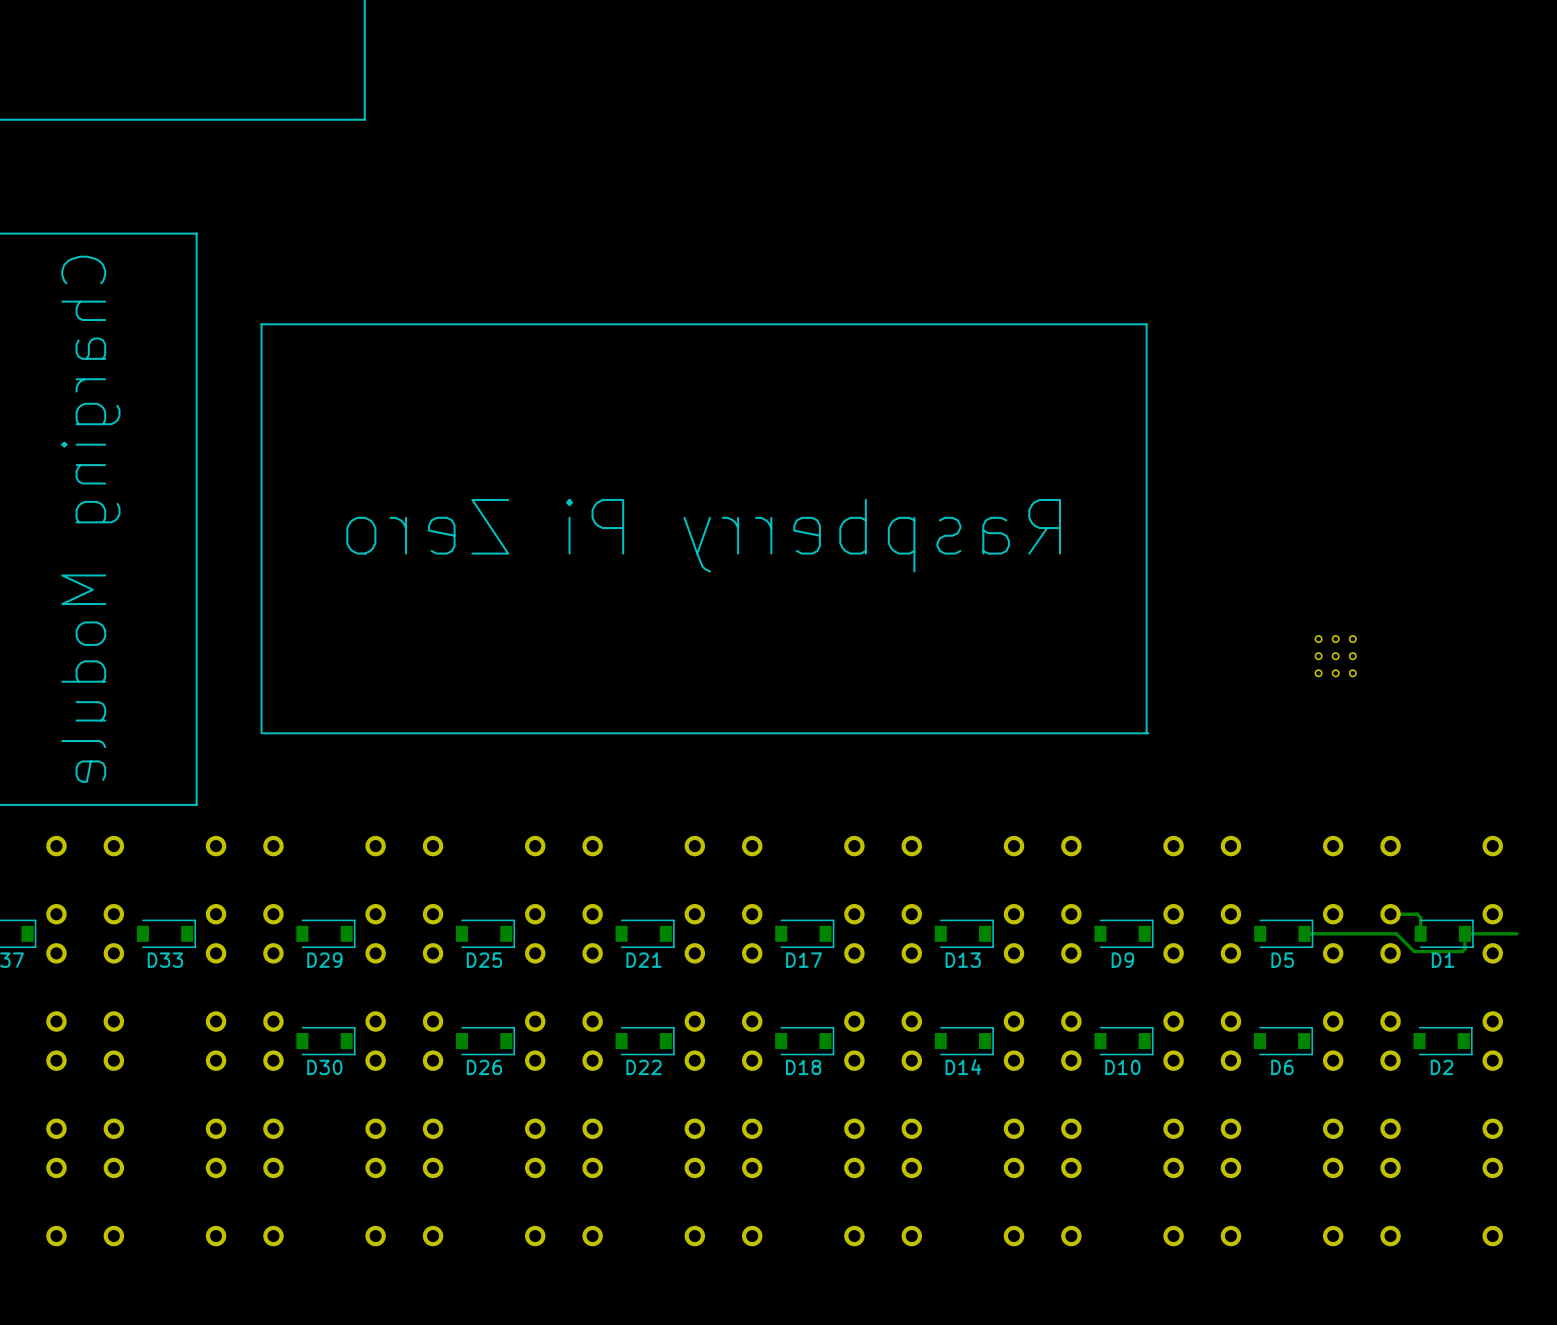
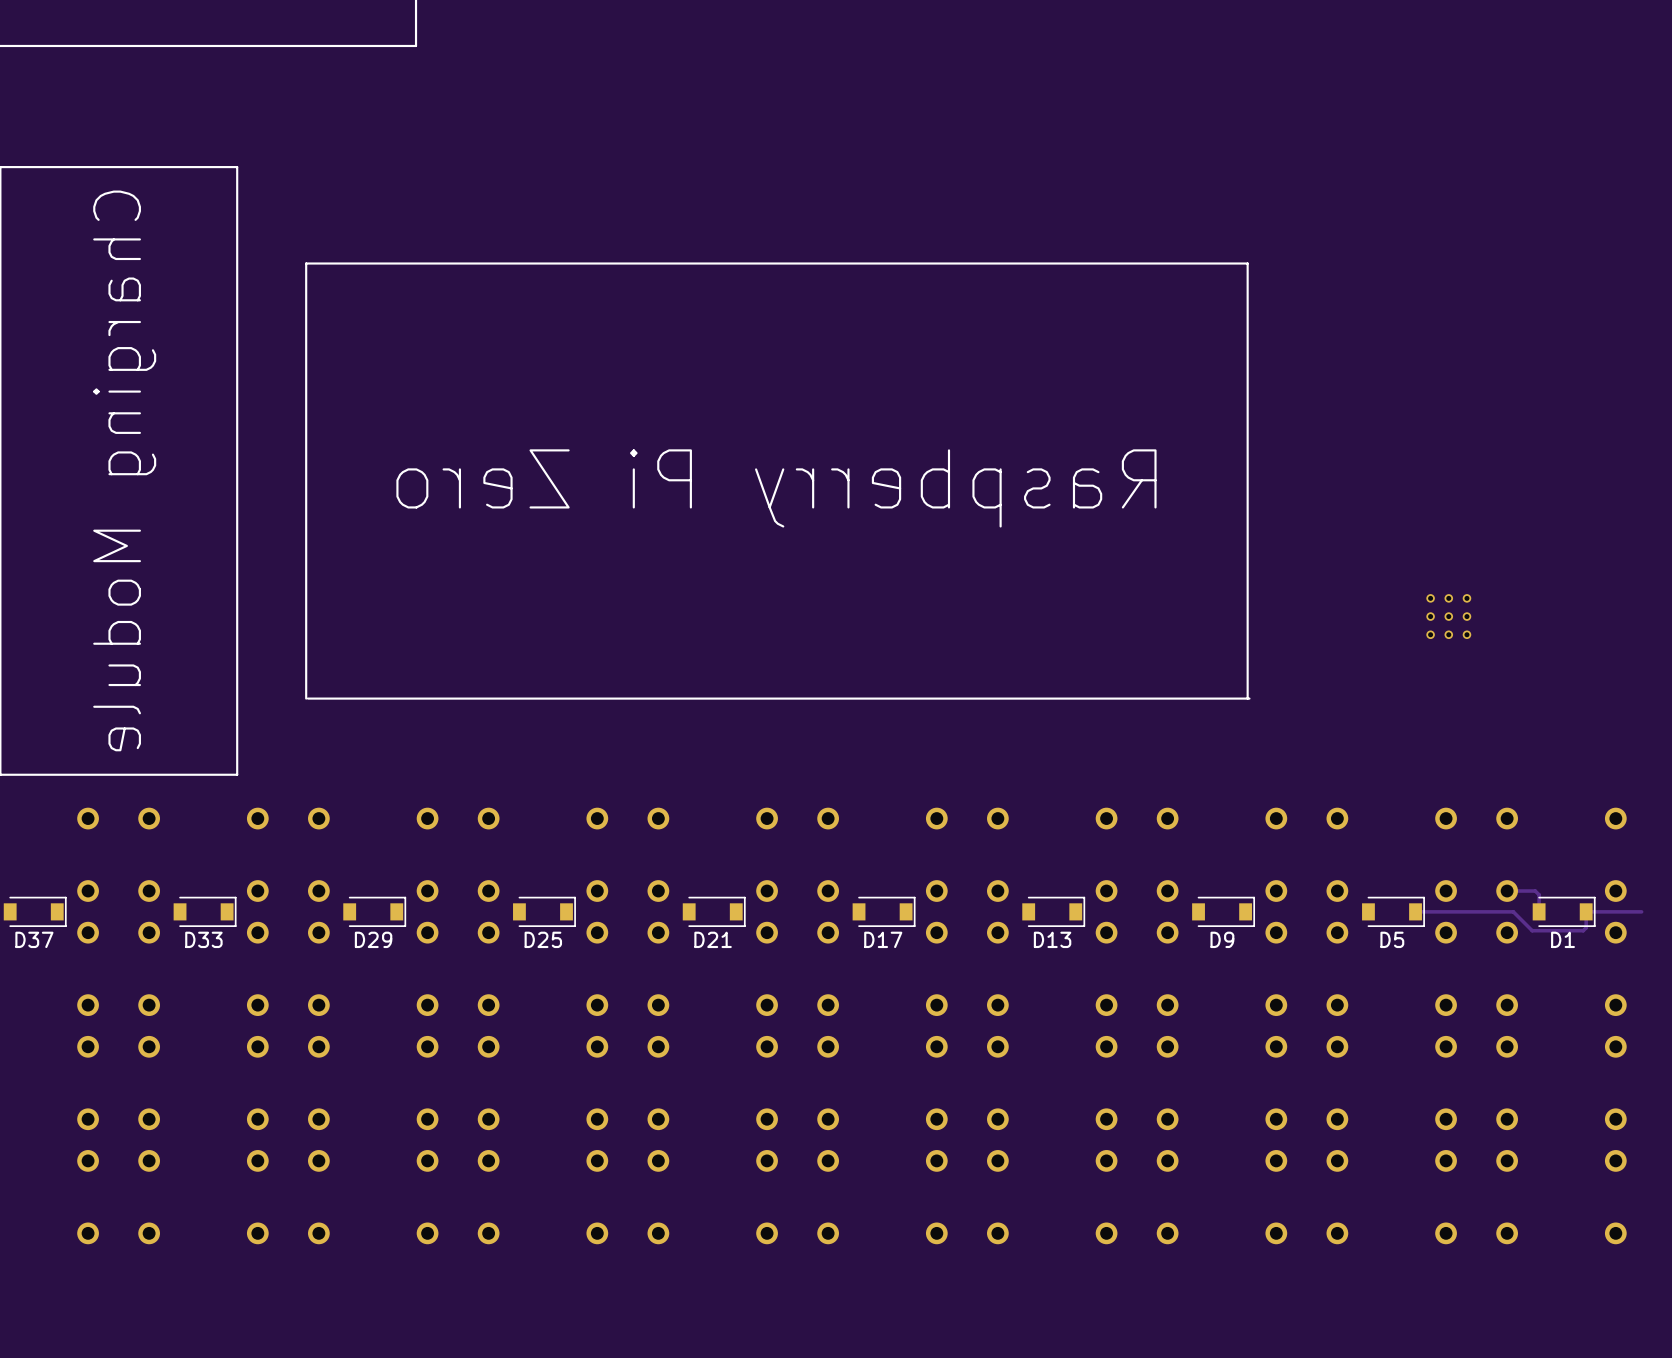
D30: (325, 1041) -> none
D26: (485, 1041) -> none
D22: (645, 1041) -> none
D18: (804, 1041) -> none
D14: (964, 1041) -> none
D10: (1123, 1041) -> none
D6: (1283, 1041) -> none
D2: (1443, 1041) -> none

